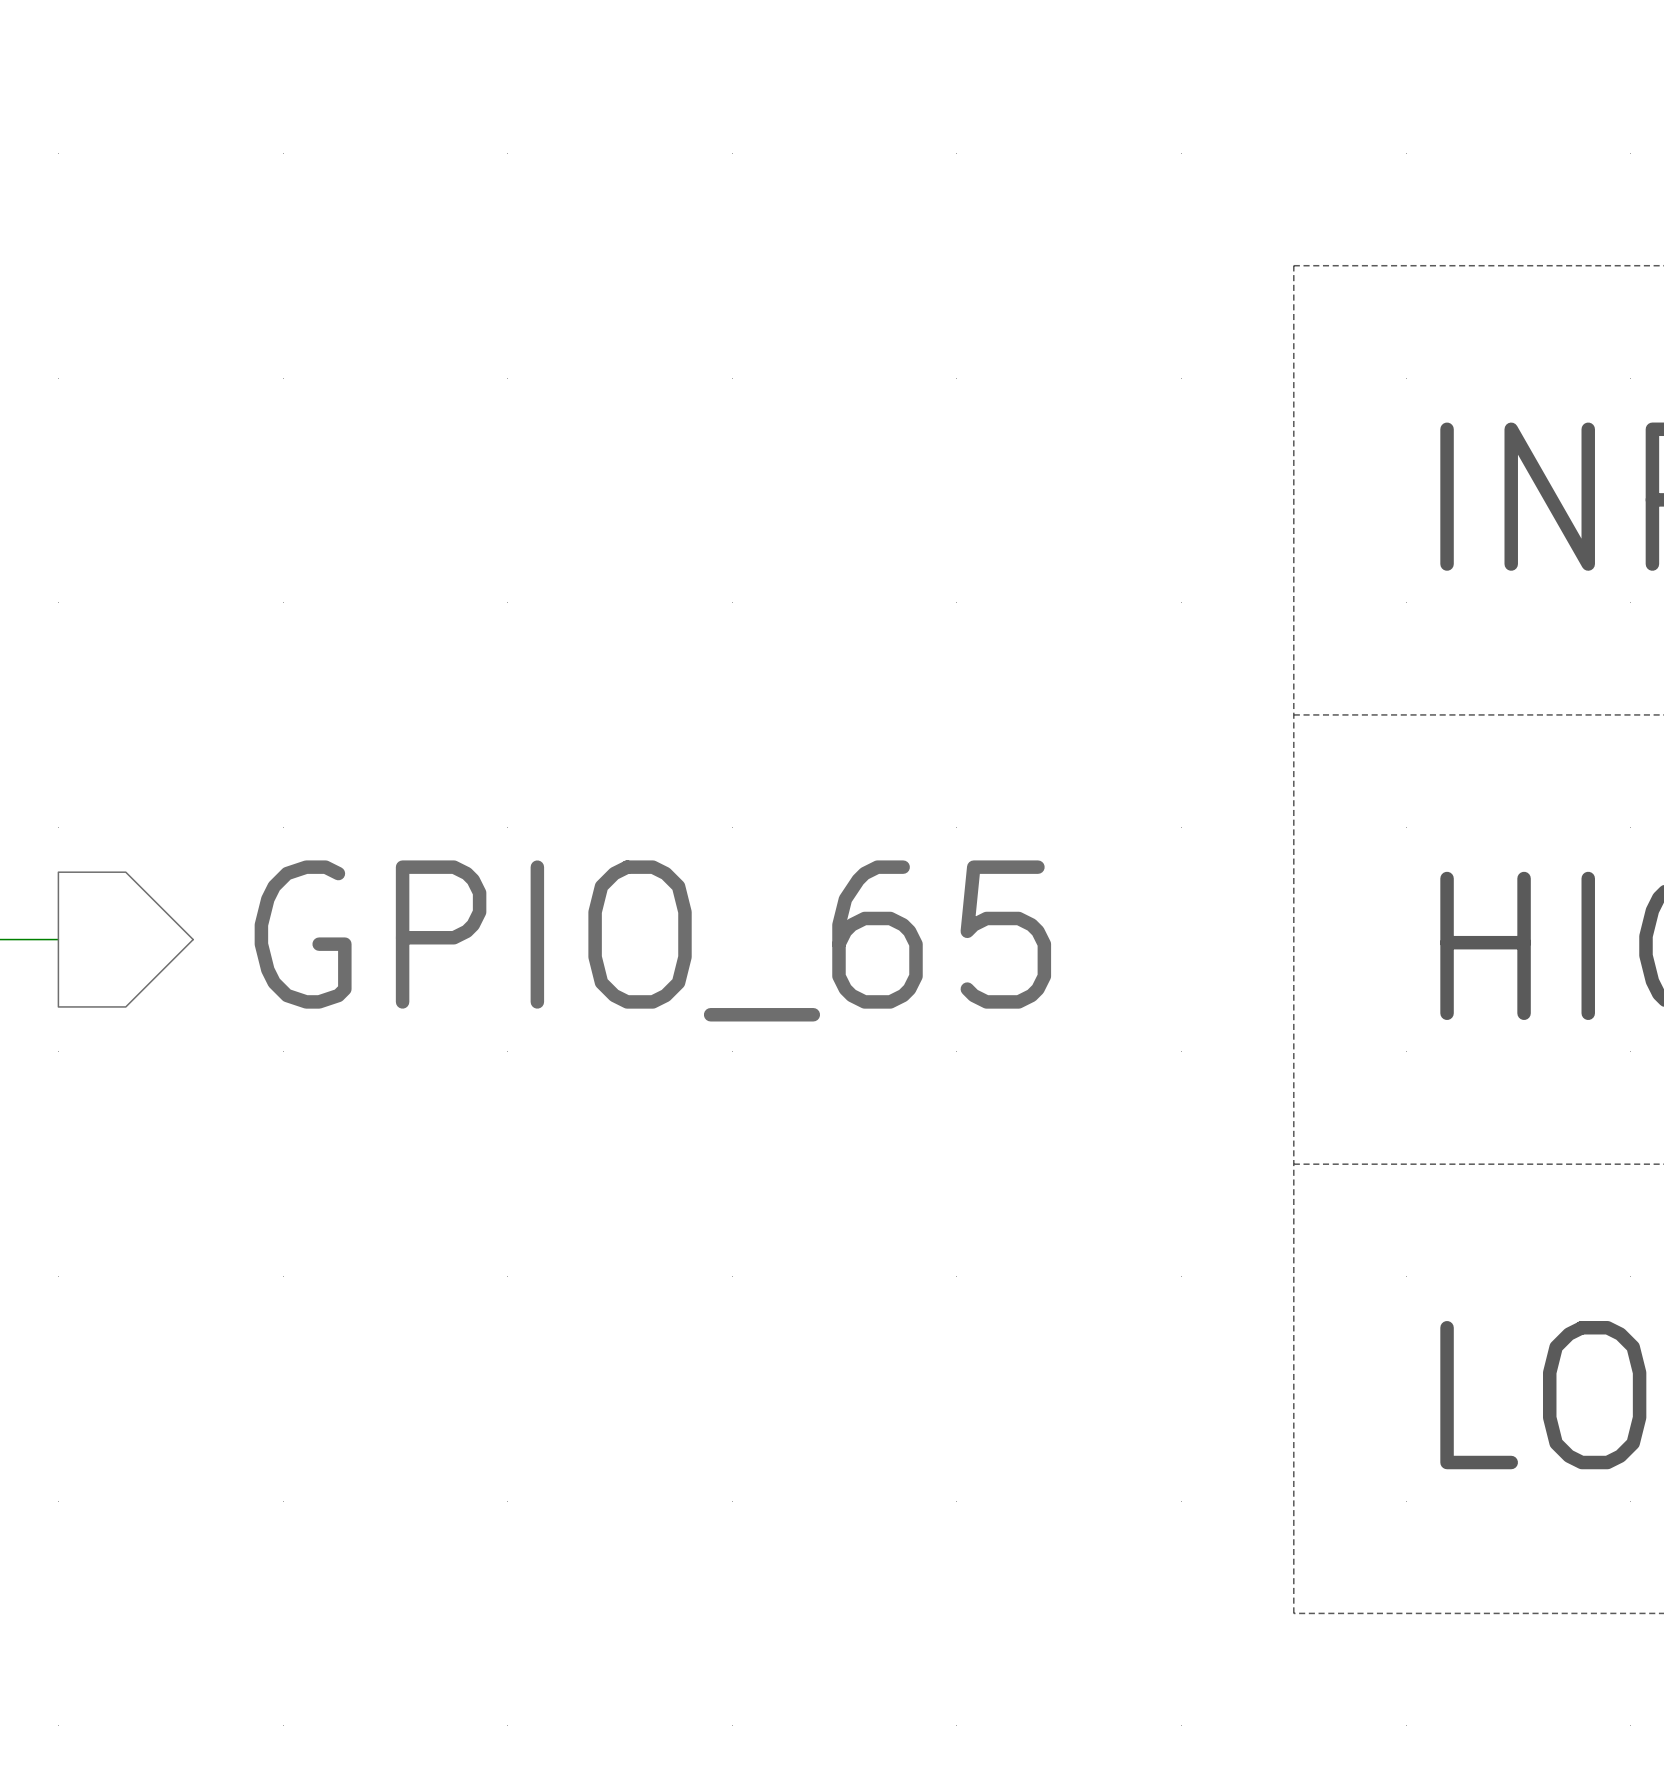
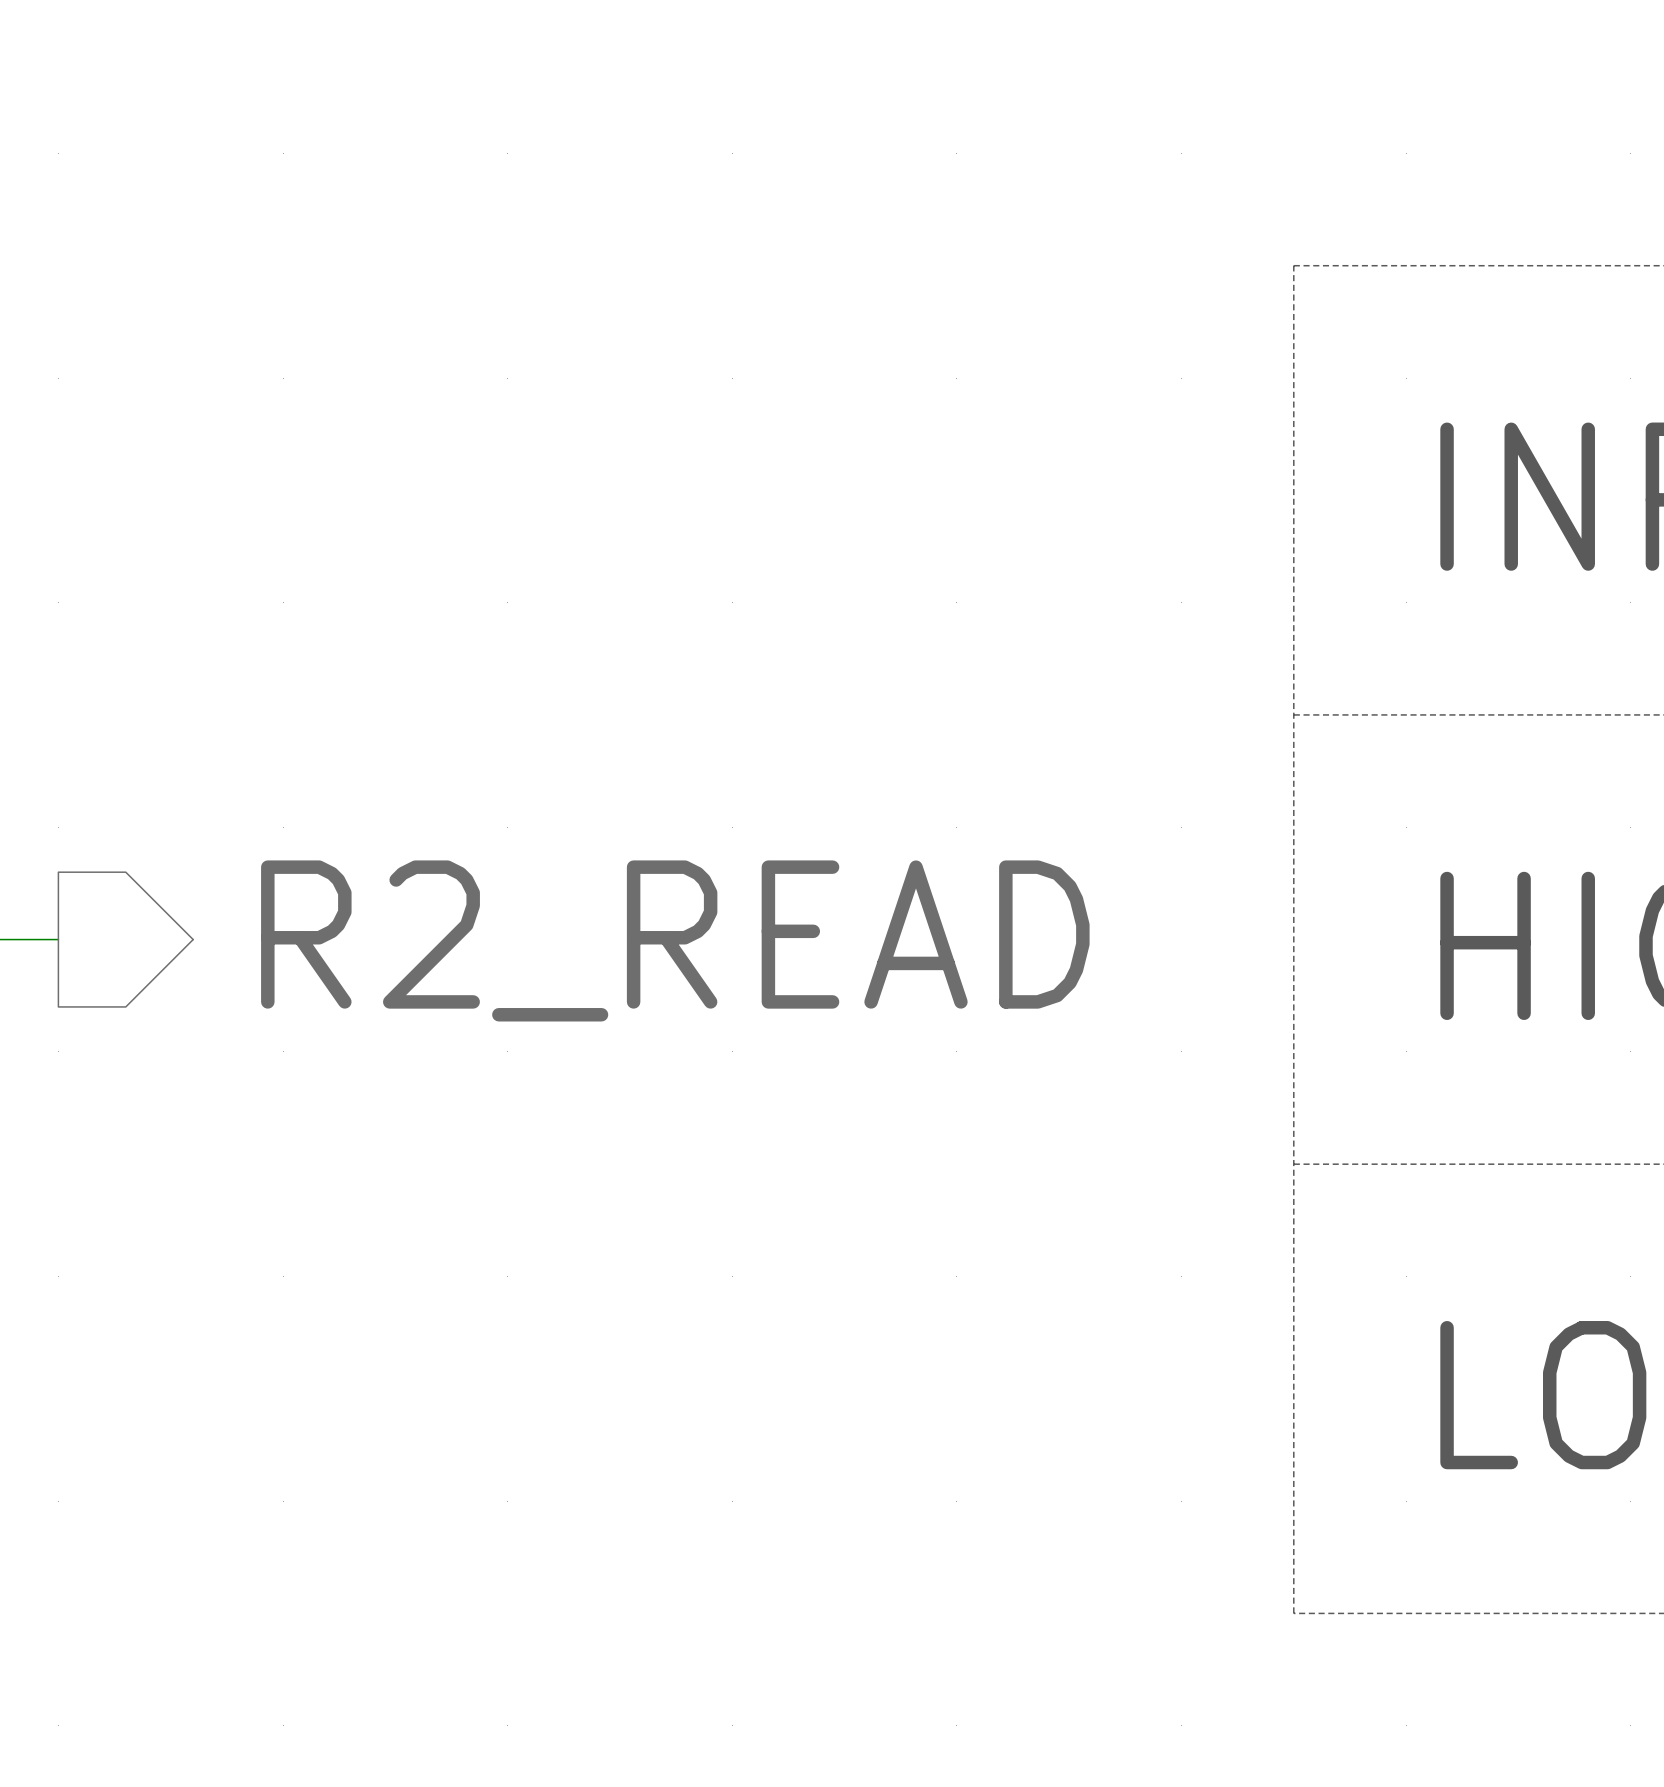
hierarchical label: GPIO_65 (652, 940) -> R2_READ (675, 940)

